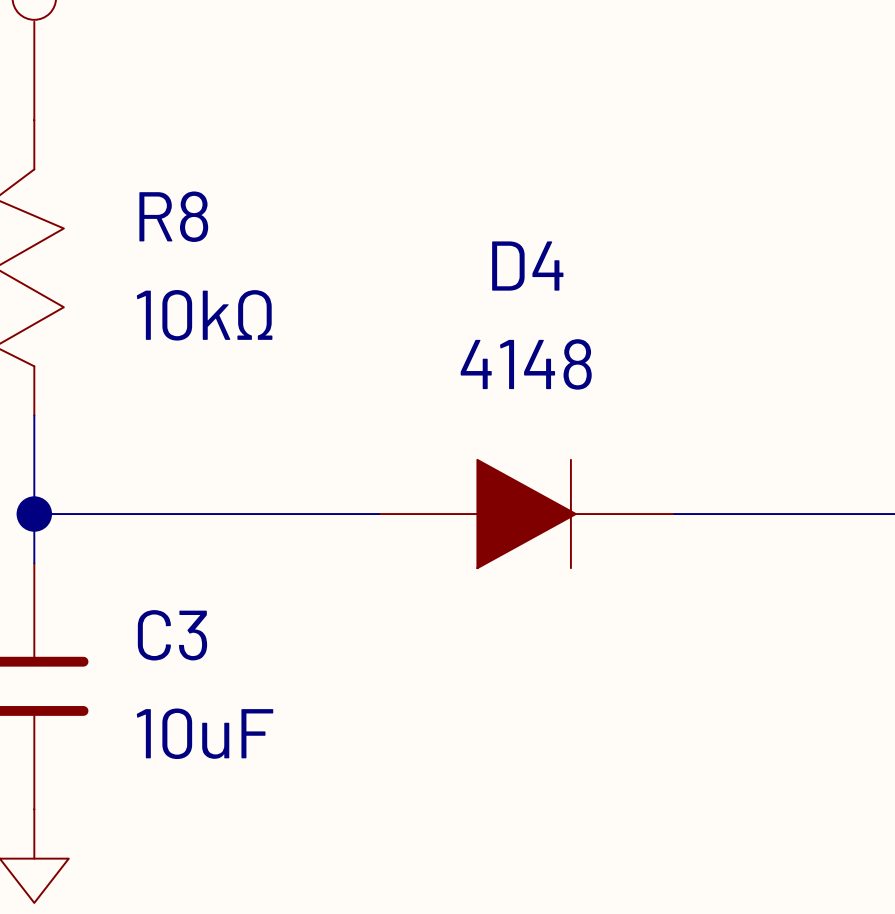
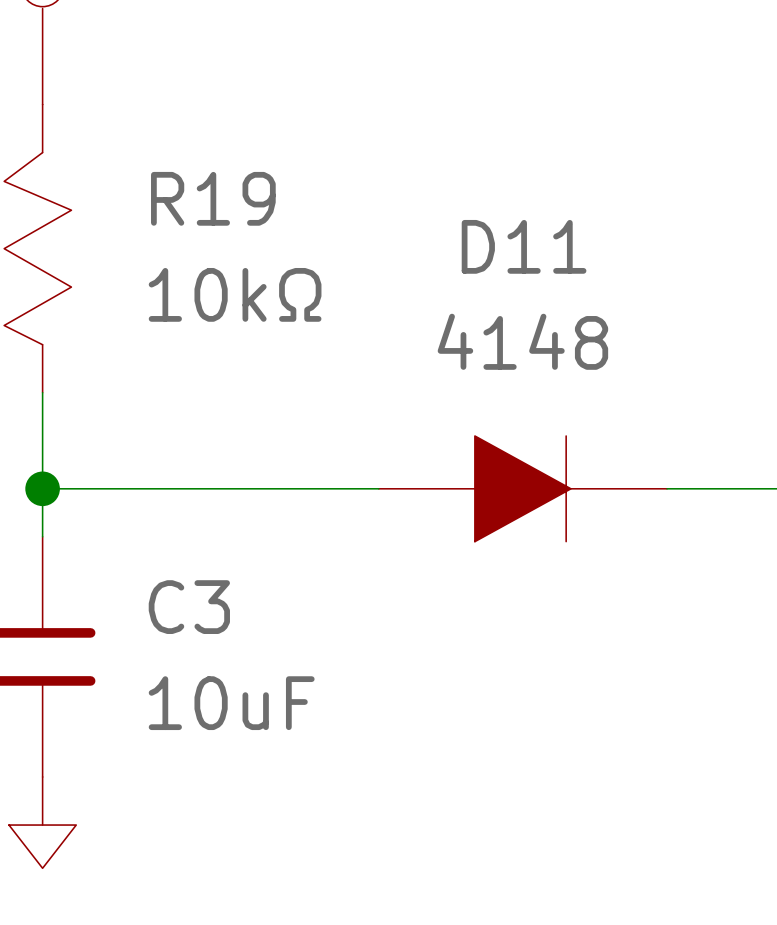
R8 name: R8 (173, 216) -> R19 (213, 198)
D4 name: D4 (527, 266) -> D11 (524, 246)

